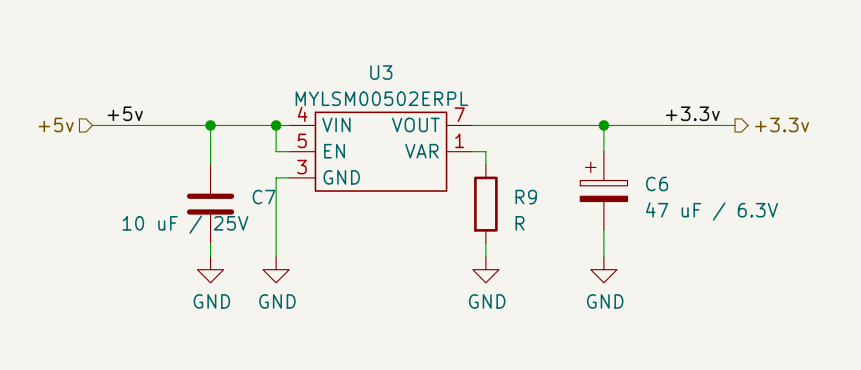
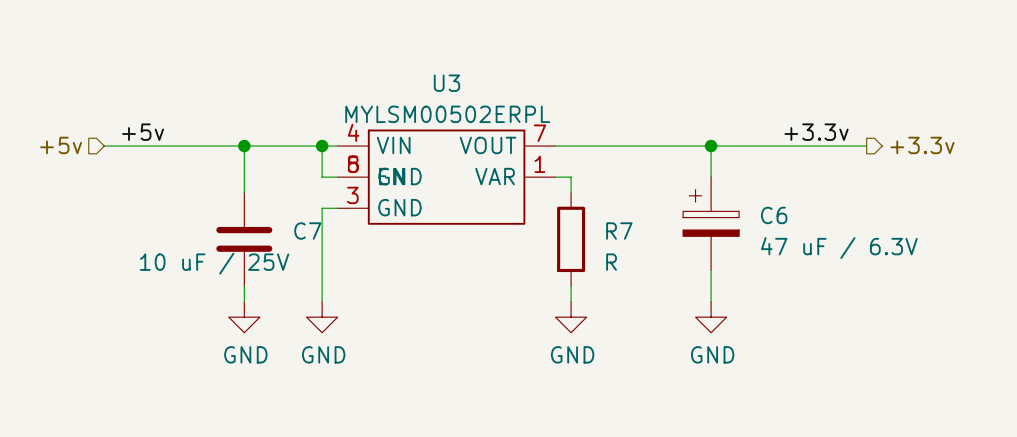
U3 symbol: [289, 111, 473, 192] -> [337, 129, 556, 225]
R9 name: R9 (526, 197) -> R7 (619, 231)

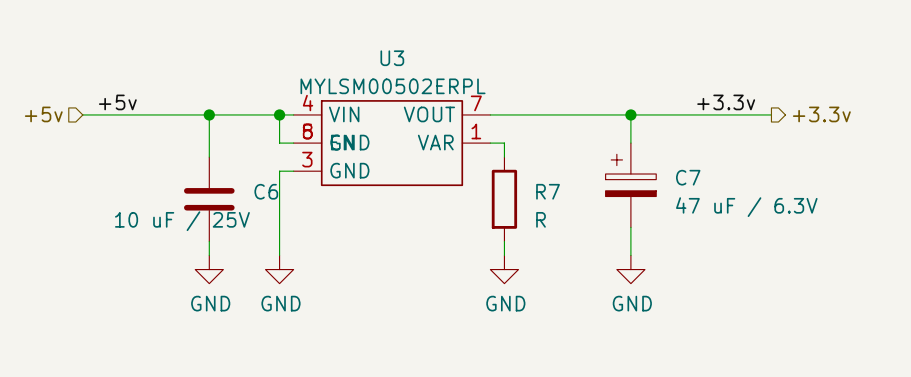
C6 name: C6 (774, 215) -> C7 (688, 177)
C7 name: C7 (307, 231) -> C6 (266, 191)

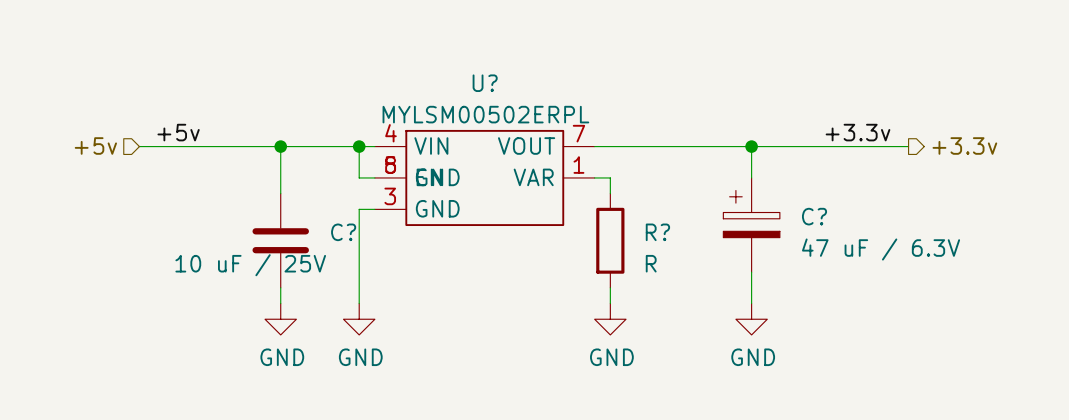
U3 name: U3 (392, 58) -> U? (485, 83)
C7 name: C7 (688, 177) -> C? (814, 216)
C6 name: C6 (266, 191) -> C? (343, 232)
R7 name: R7 (548, 191) -> R? (657, 232)

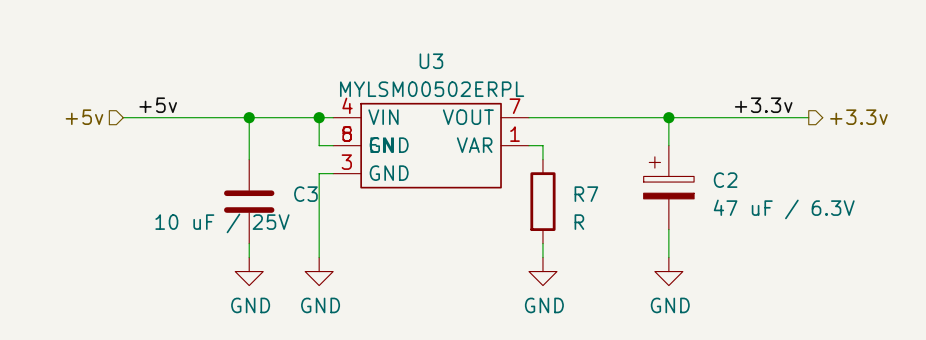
U? name: U? (485, 83) -> U3 (431, 61)
C? name: C? (814, 216) -> C2 (725, 180)
C? name: C? (343, 232) -> C3 (305, 194)
R? name: R? (657, 232) -> R7 (586, 194)

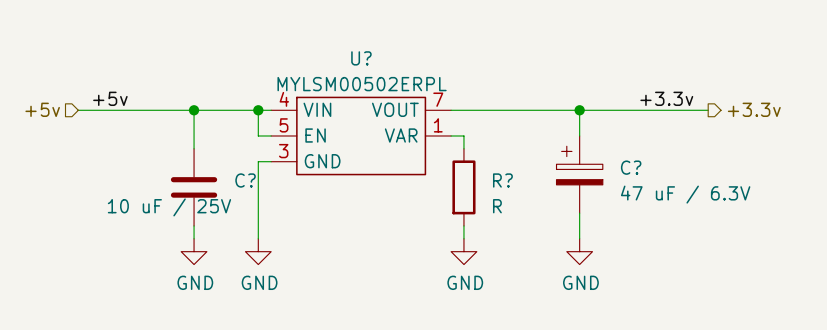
U3 name: U3 (431, 61) -> U? (361, 58)
U3 symbol: [333, 102, 529, 189] -> [271, 96, 452, 176]
C2 name: C2 (725, 180) -> C? (631, 167)
C3 name: C3 (305, 194) -> C? (245, 180)
R7 name: R7 (586, 194) -> R? (502, 180)

